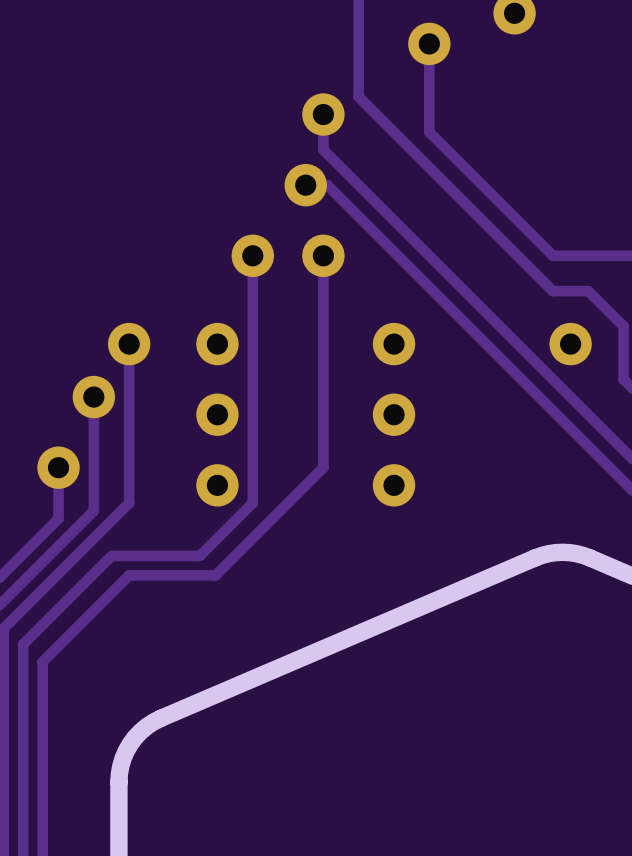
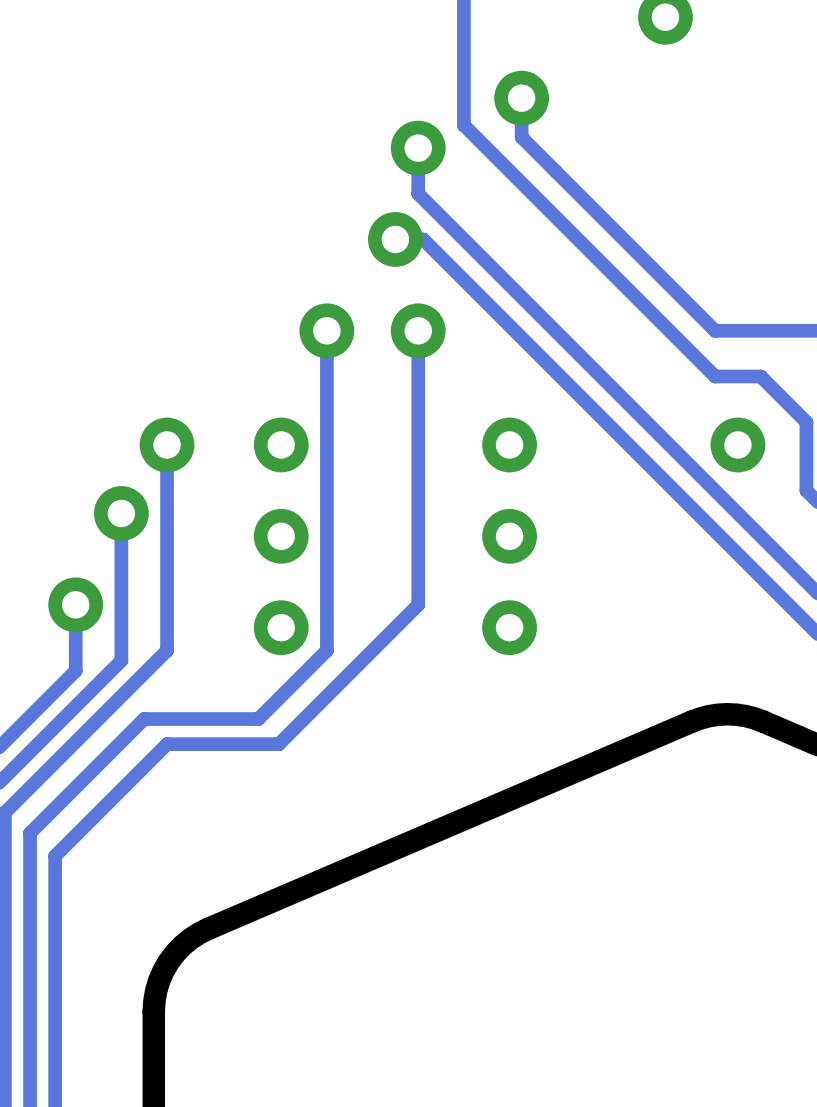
track: (429, 43) (429, 132) -> (521, 98) (521, 137) (555, 170)
via position: (429, 43) -> (521, 98)

